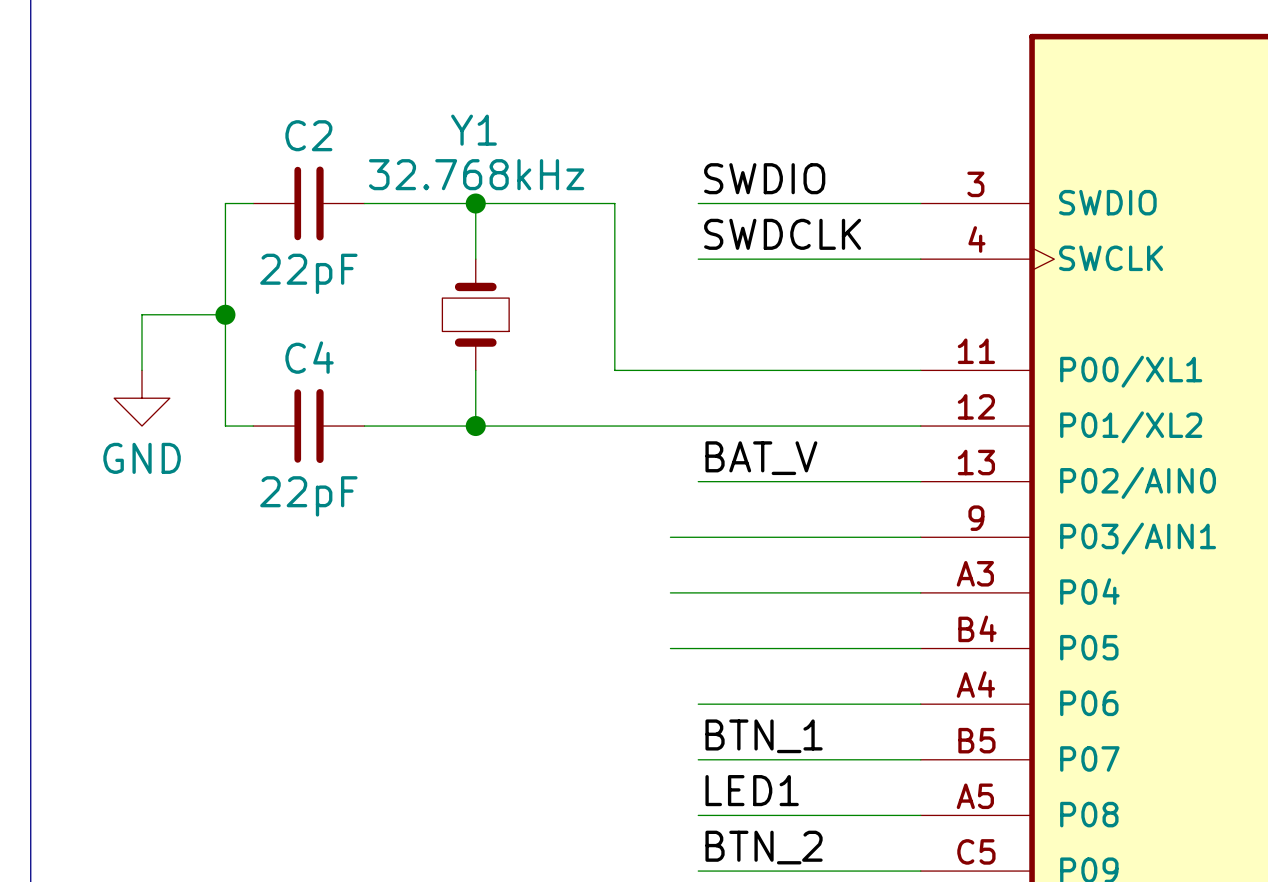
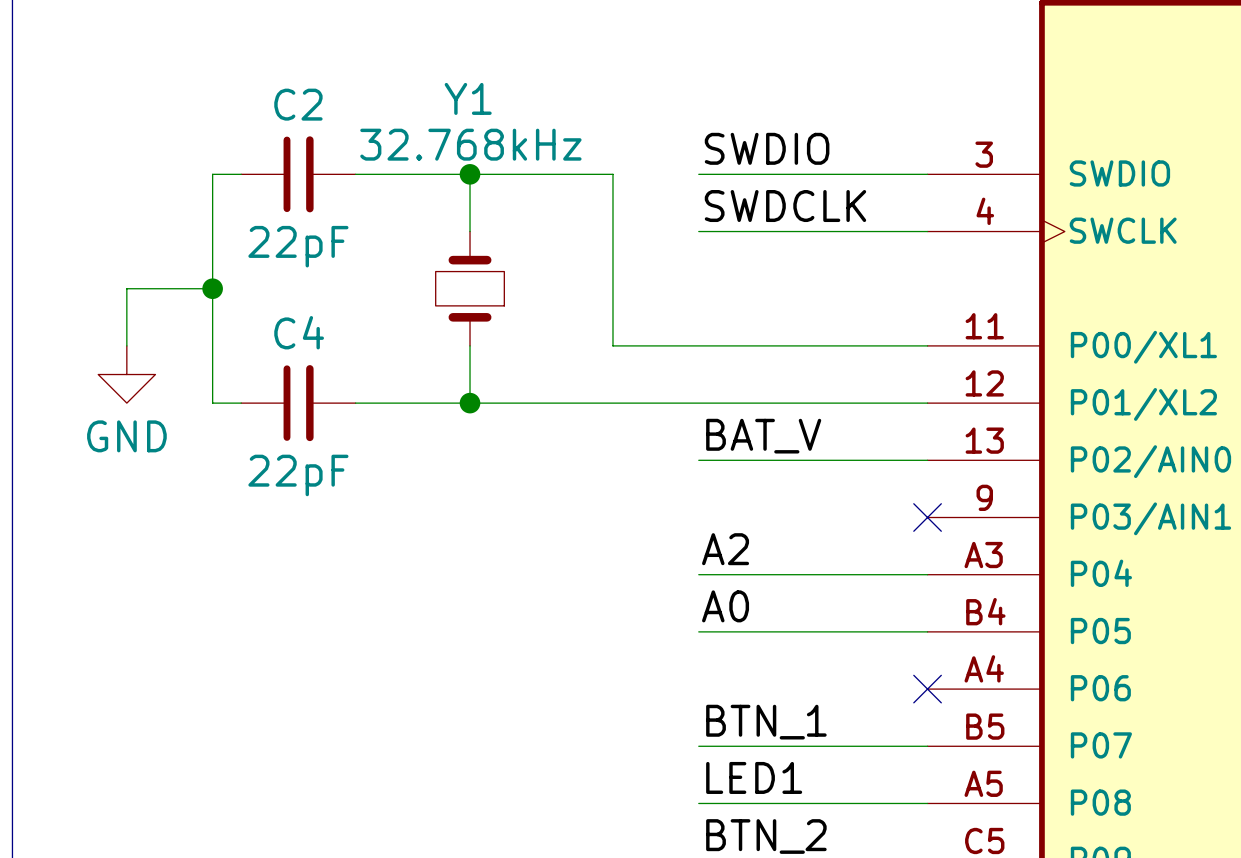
wire: (670, 537) (920, 537) -> none
no-connect mark: none -> (927, 517)
label: none -> A2 (725, 549)
wire: (670, 592) (698, 592) -> none
label: none -> A0 (725, 606)
wire: (670, 648) (698, 648) -> none
wire: (698, 704) (920, 704) -> none
no-connect mark: none -> (927, 689)

